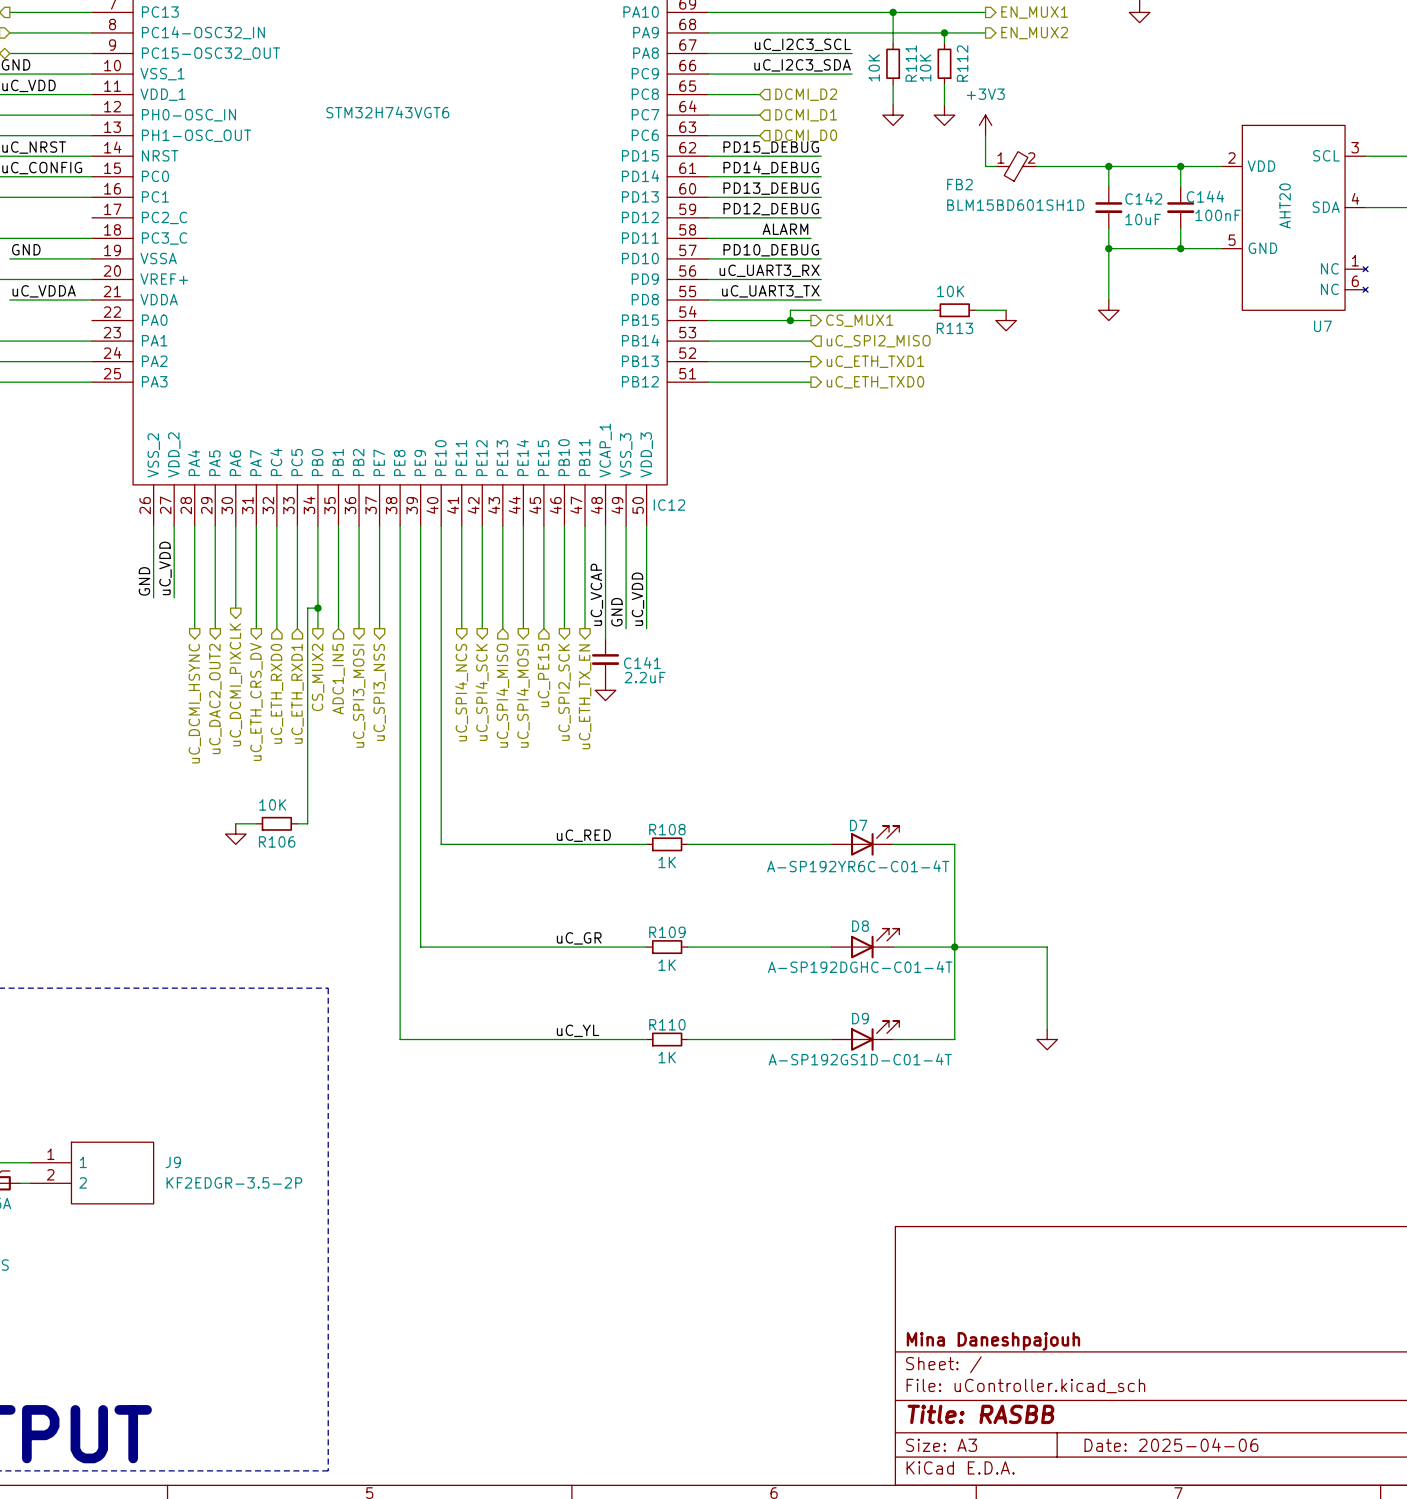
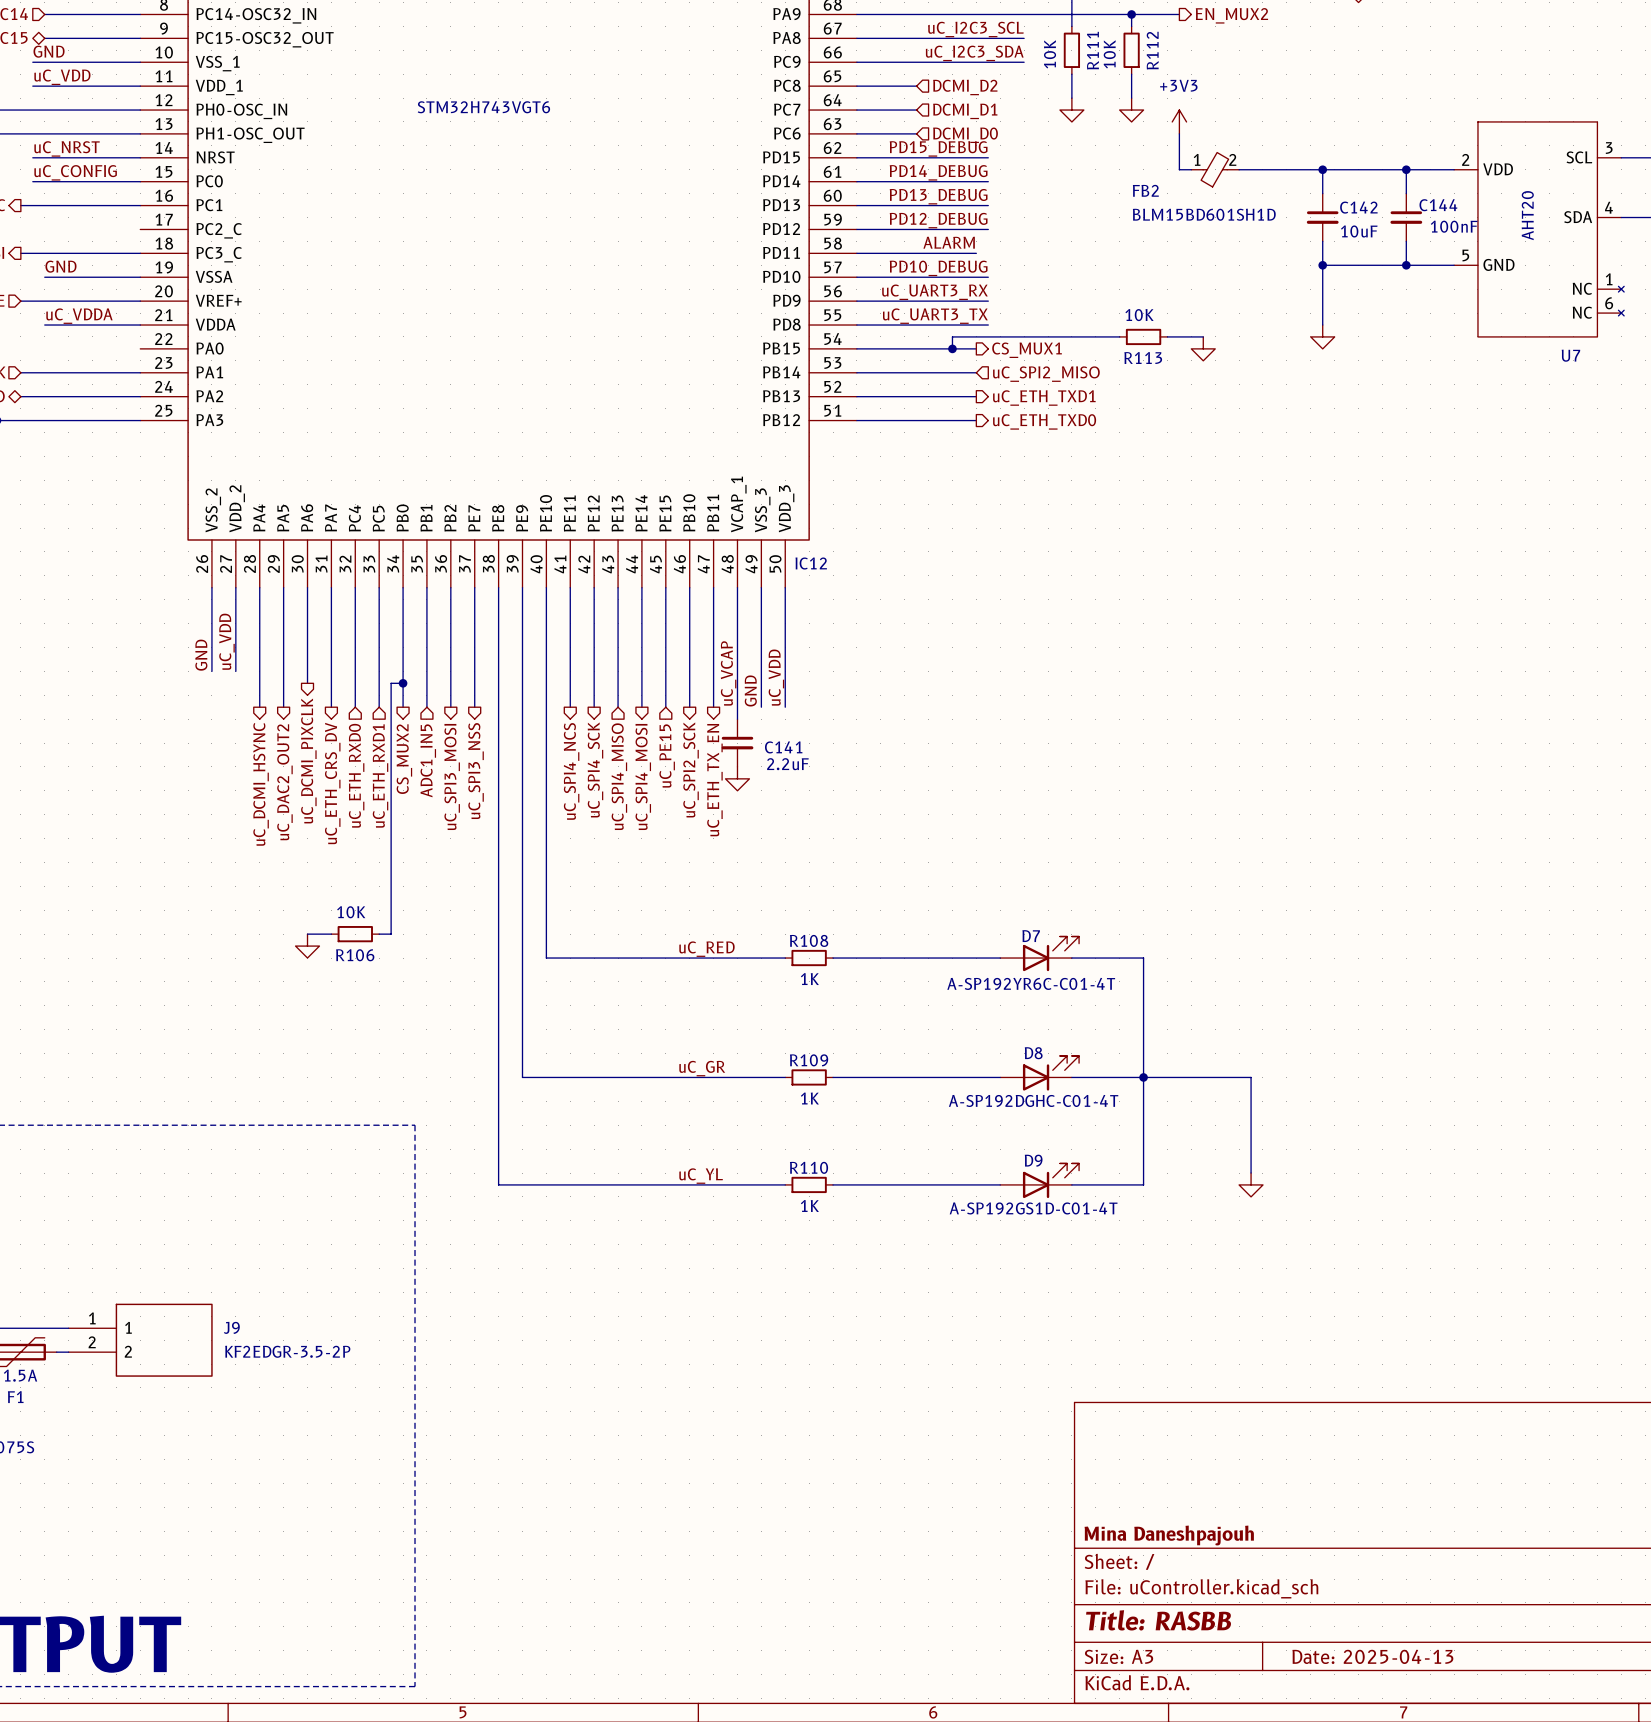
title block: Date: 2025-04-06 (1171, 1444) -> Date: 2025-04-13 (1372, 1656)

